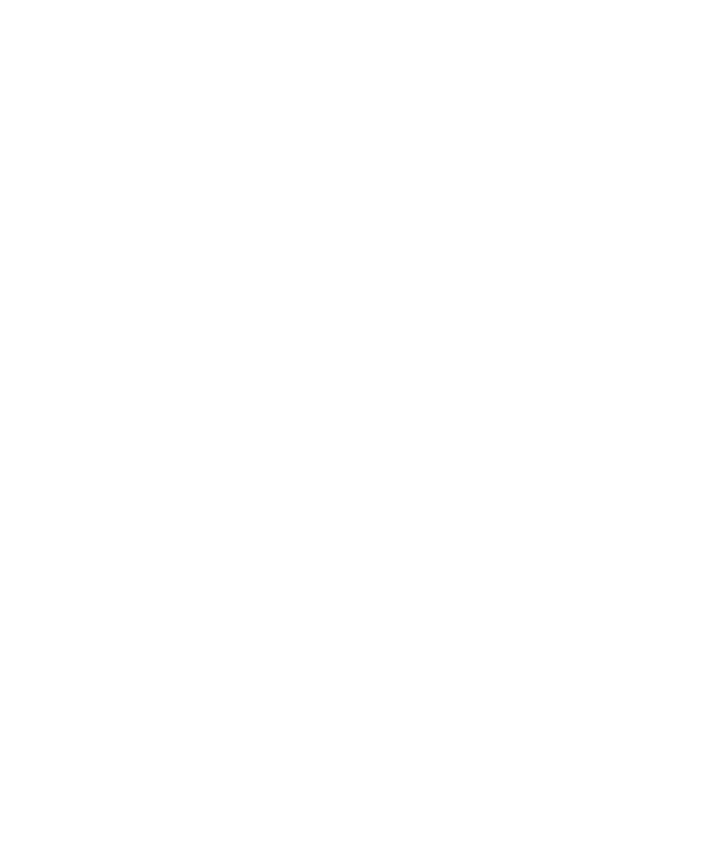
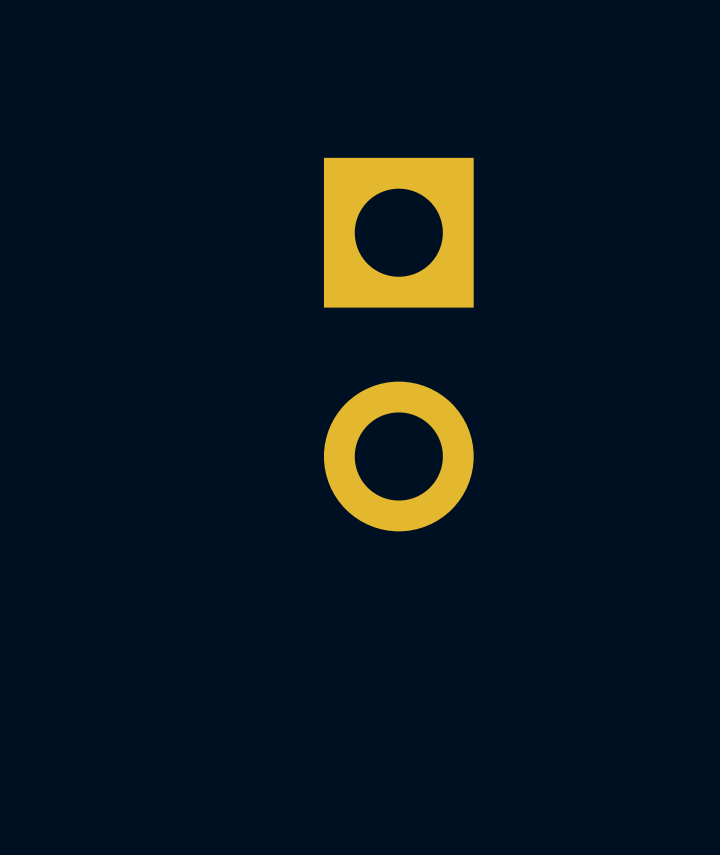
part: none -> (398, 344)

